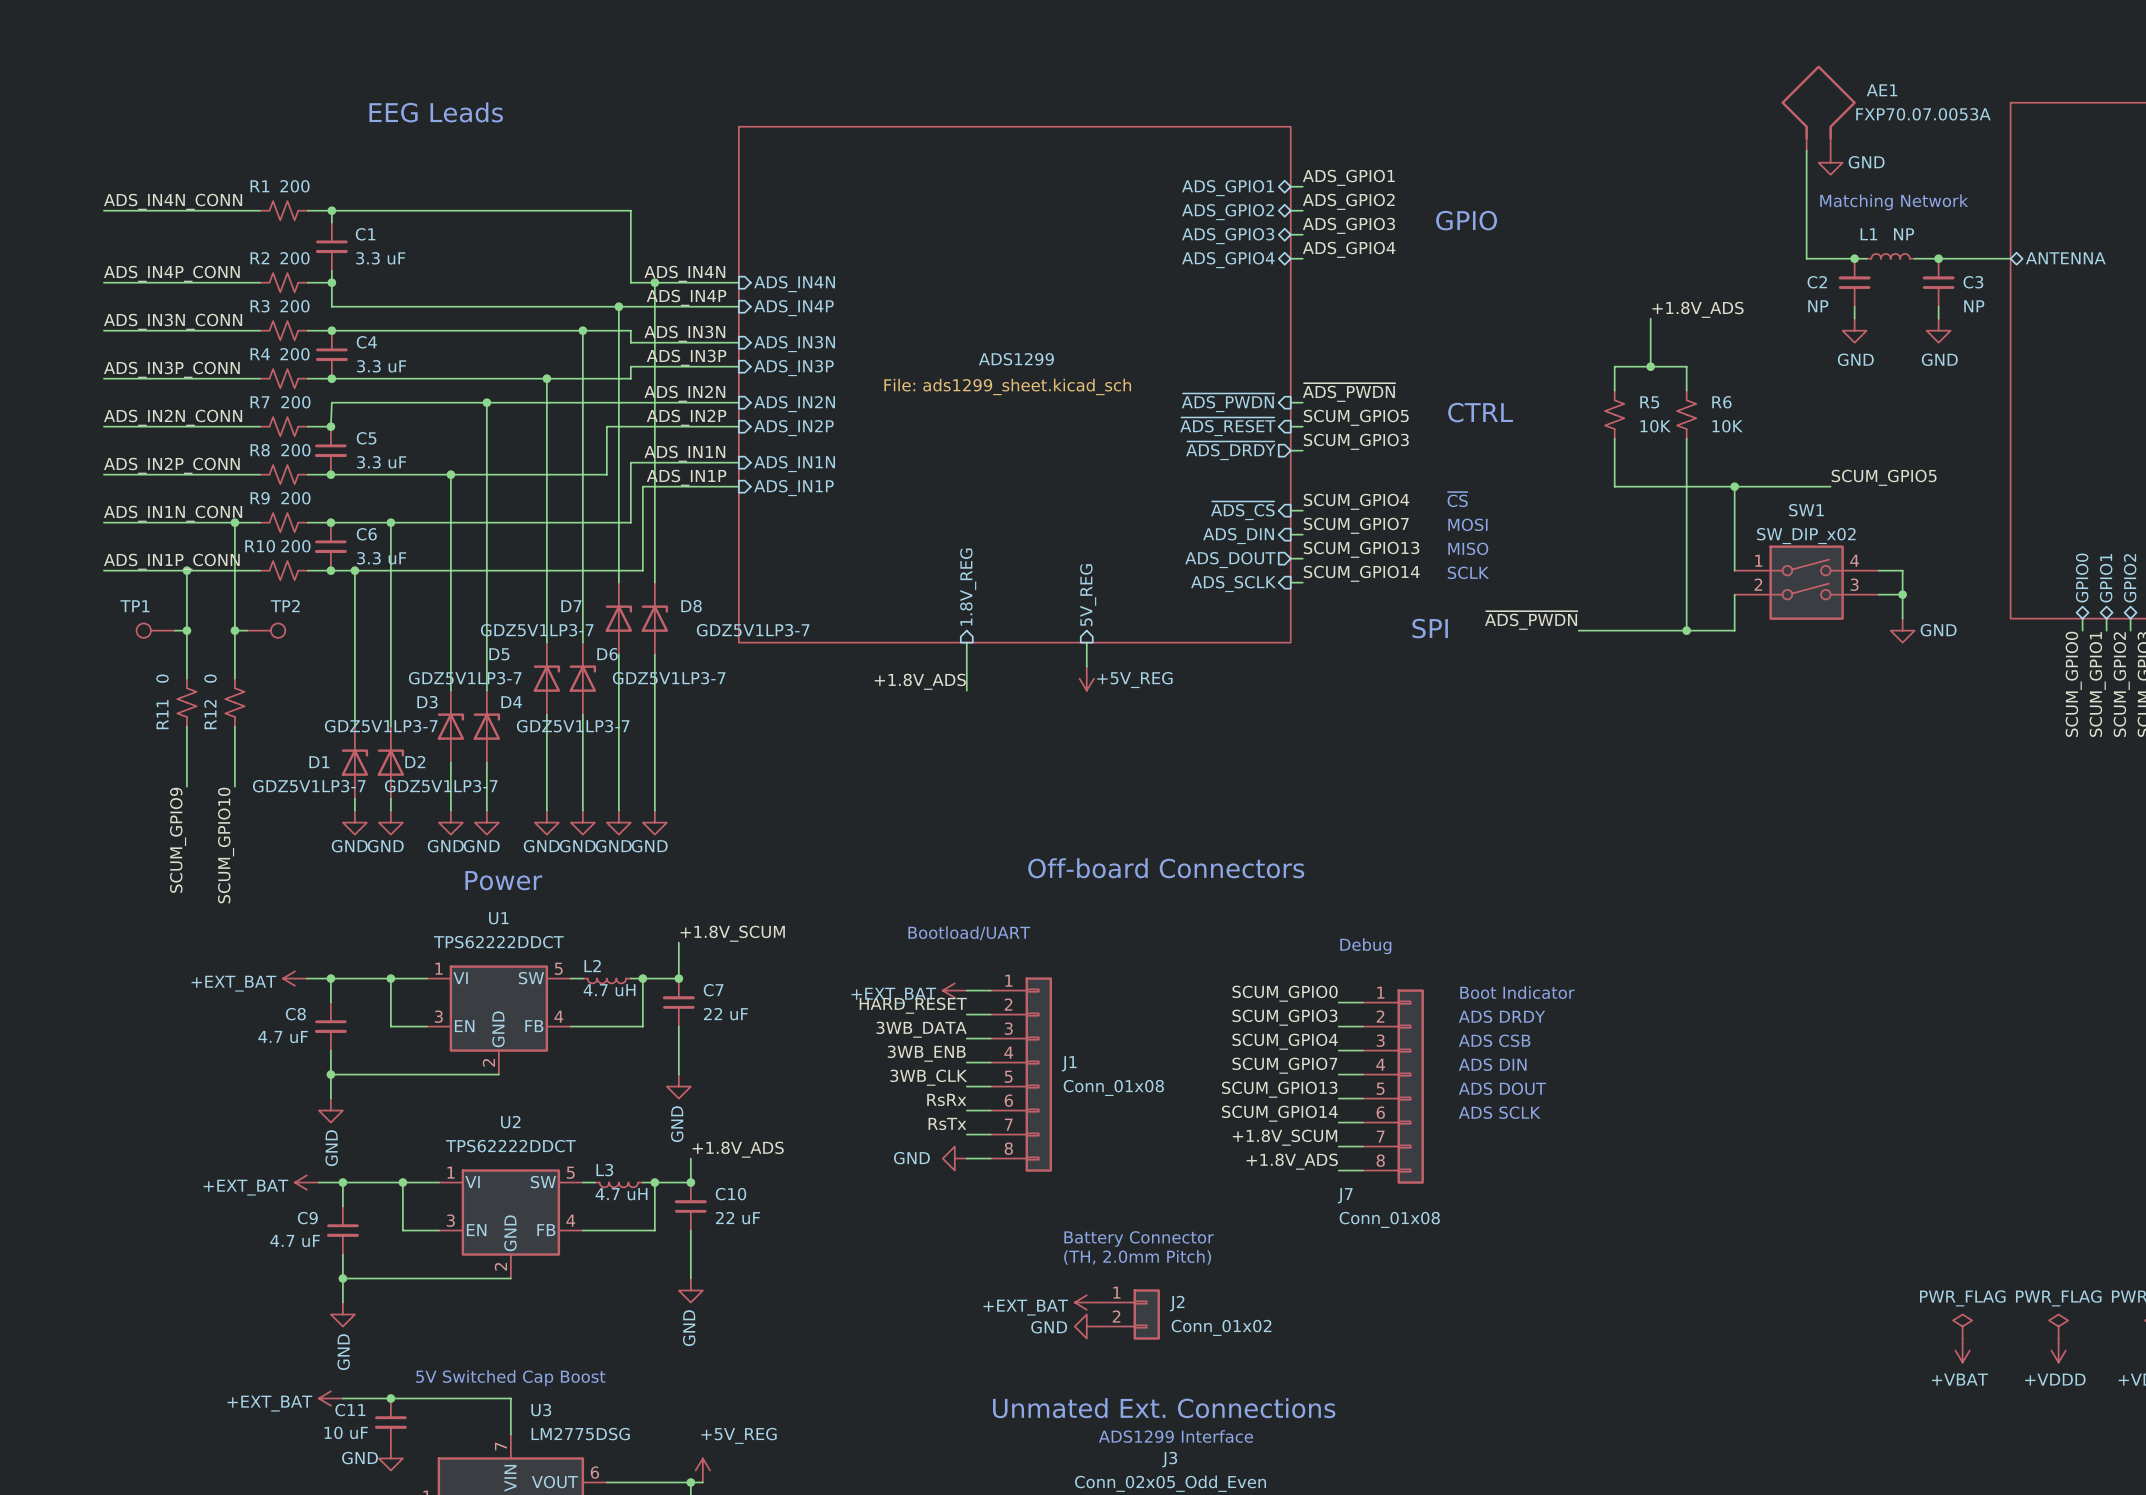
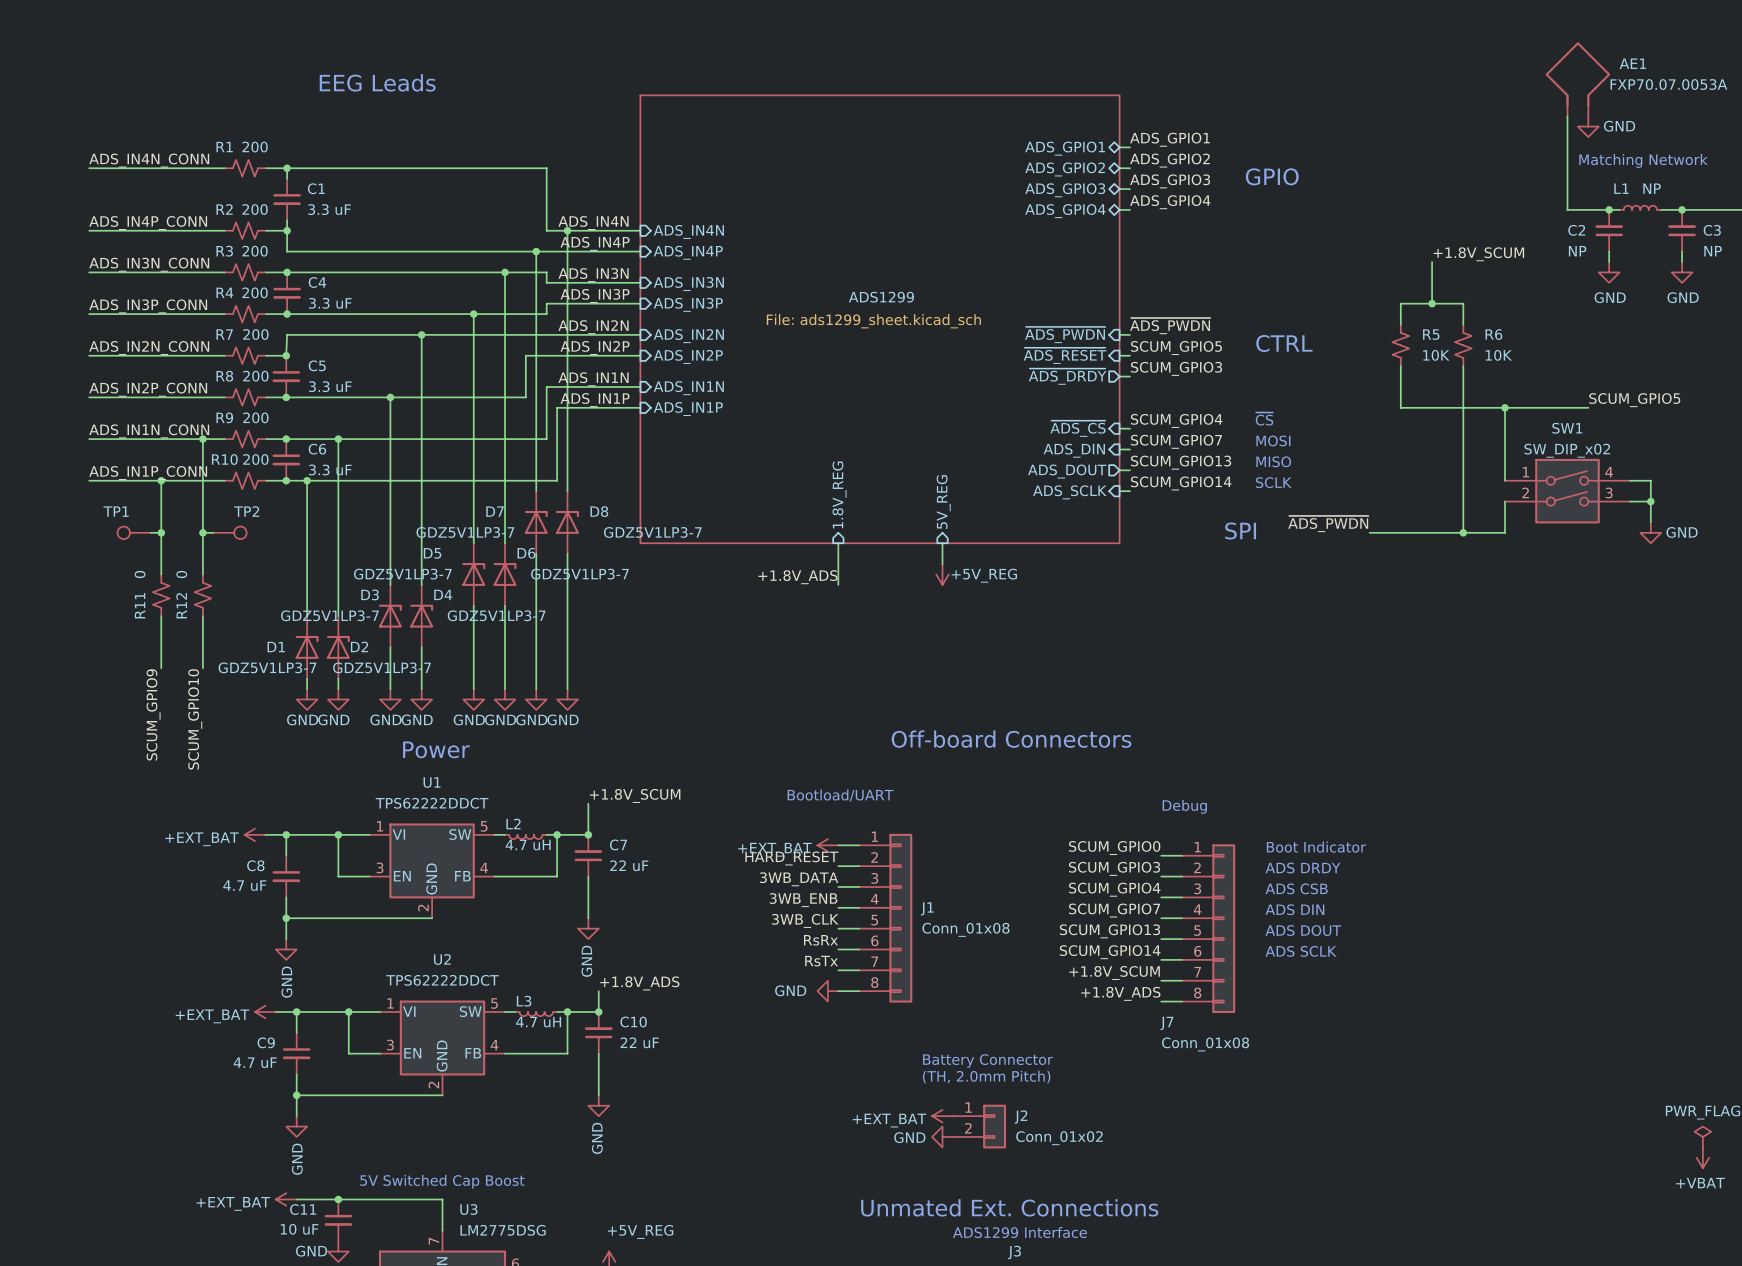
label: +1.8V_ADS (1697, 309) -> +1.8V_SCUM (1478, 254)

